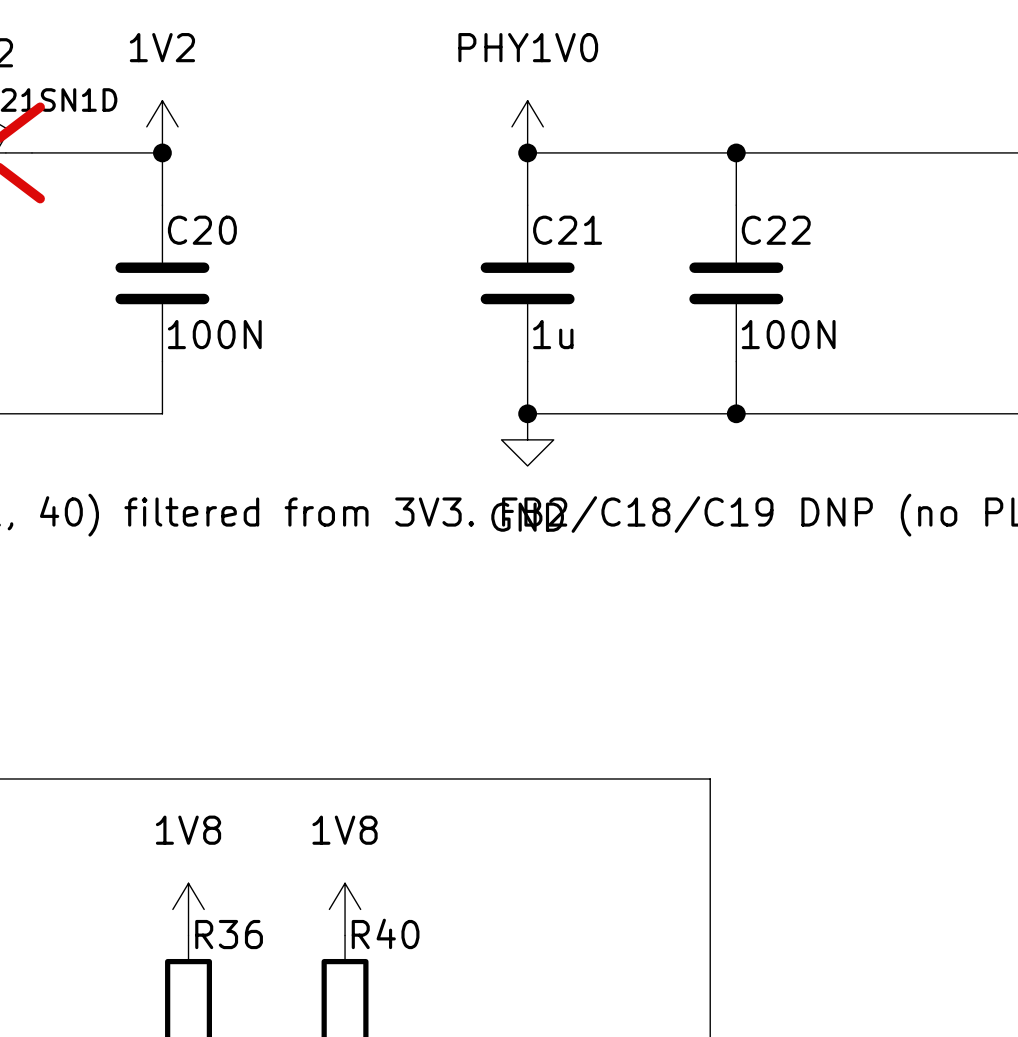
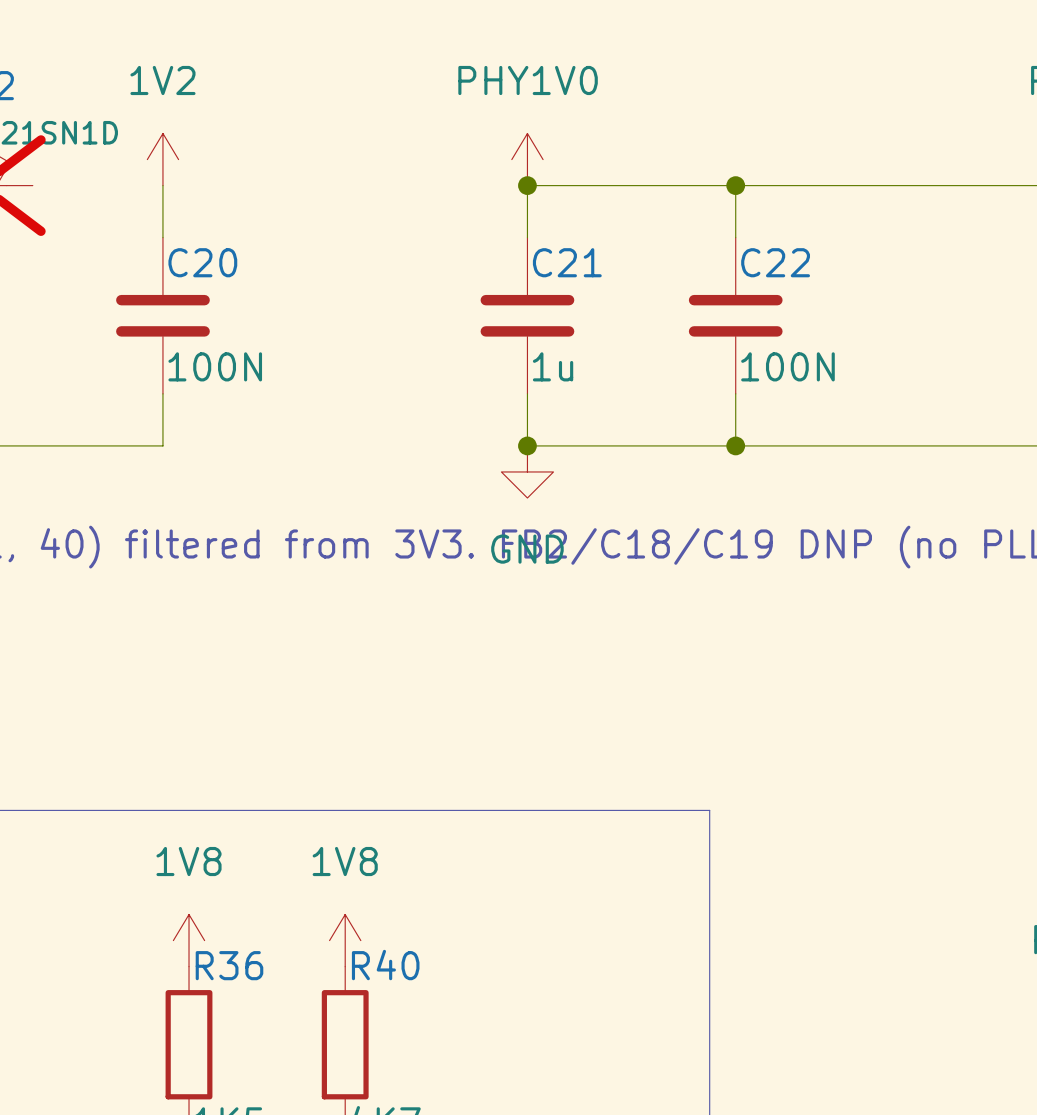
wire: (32, 152) (162, 152) -> none
junction: (162, 152) -> none

